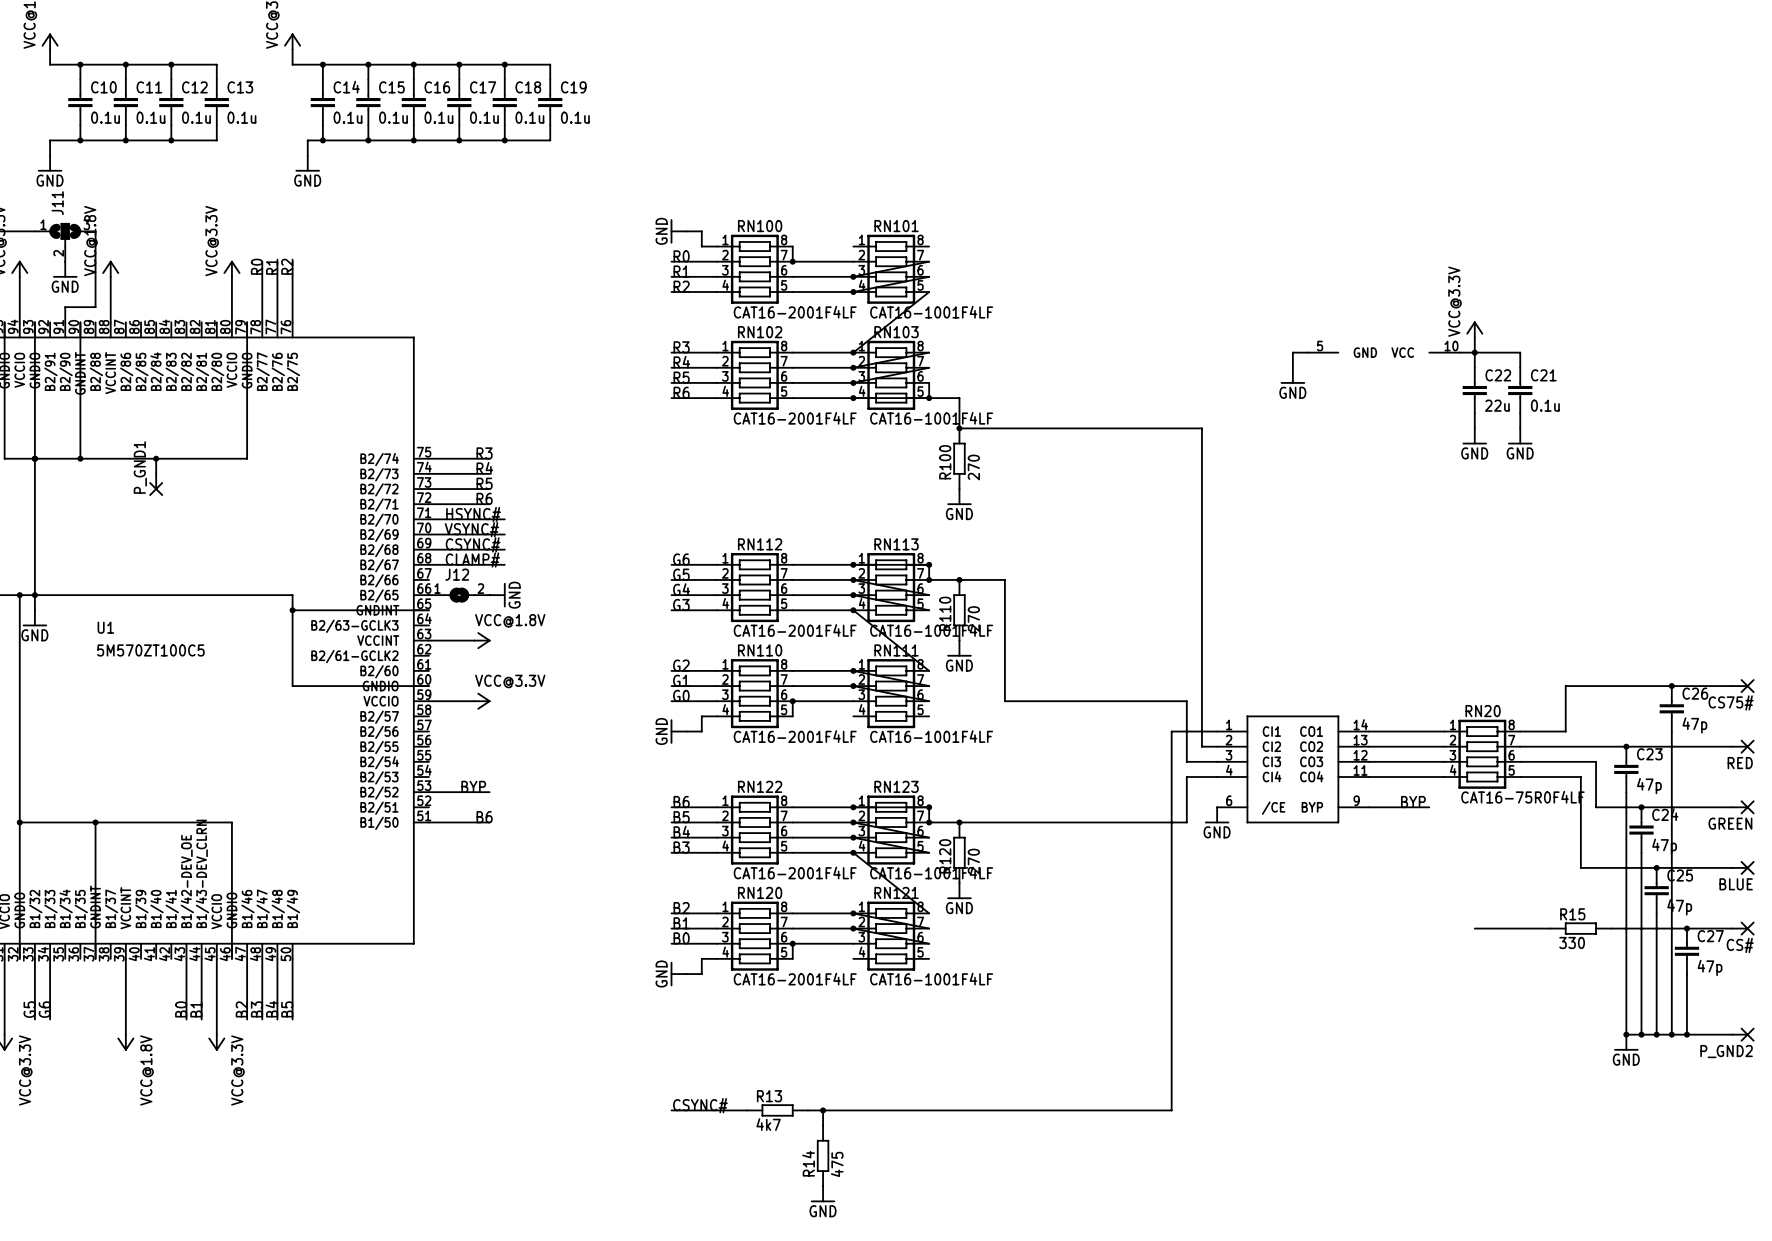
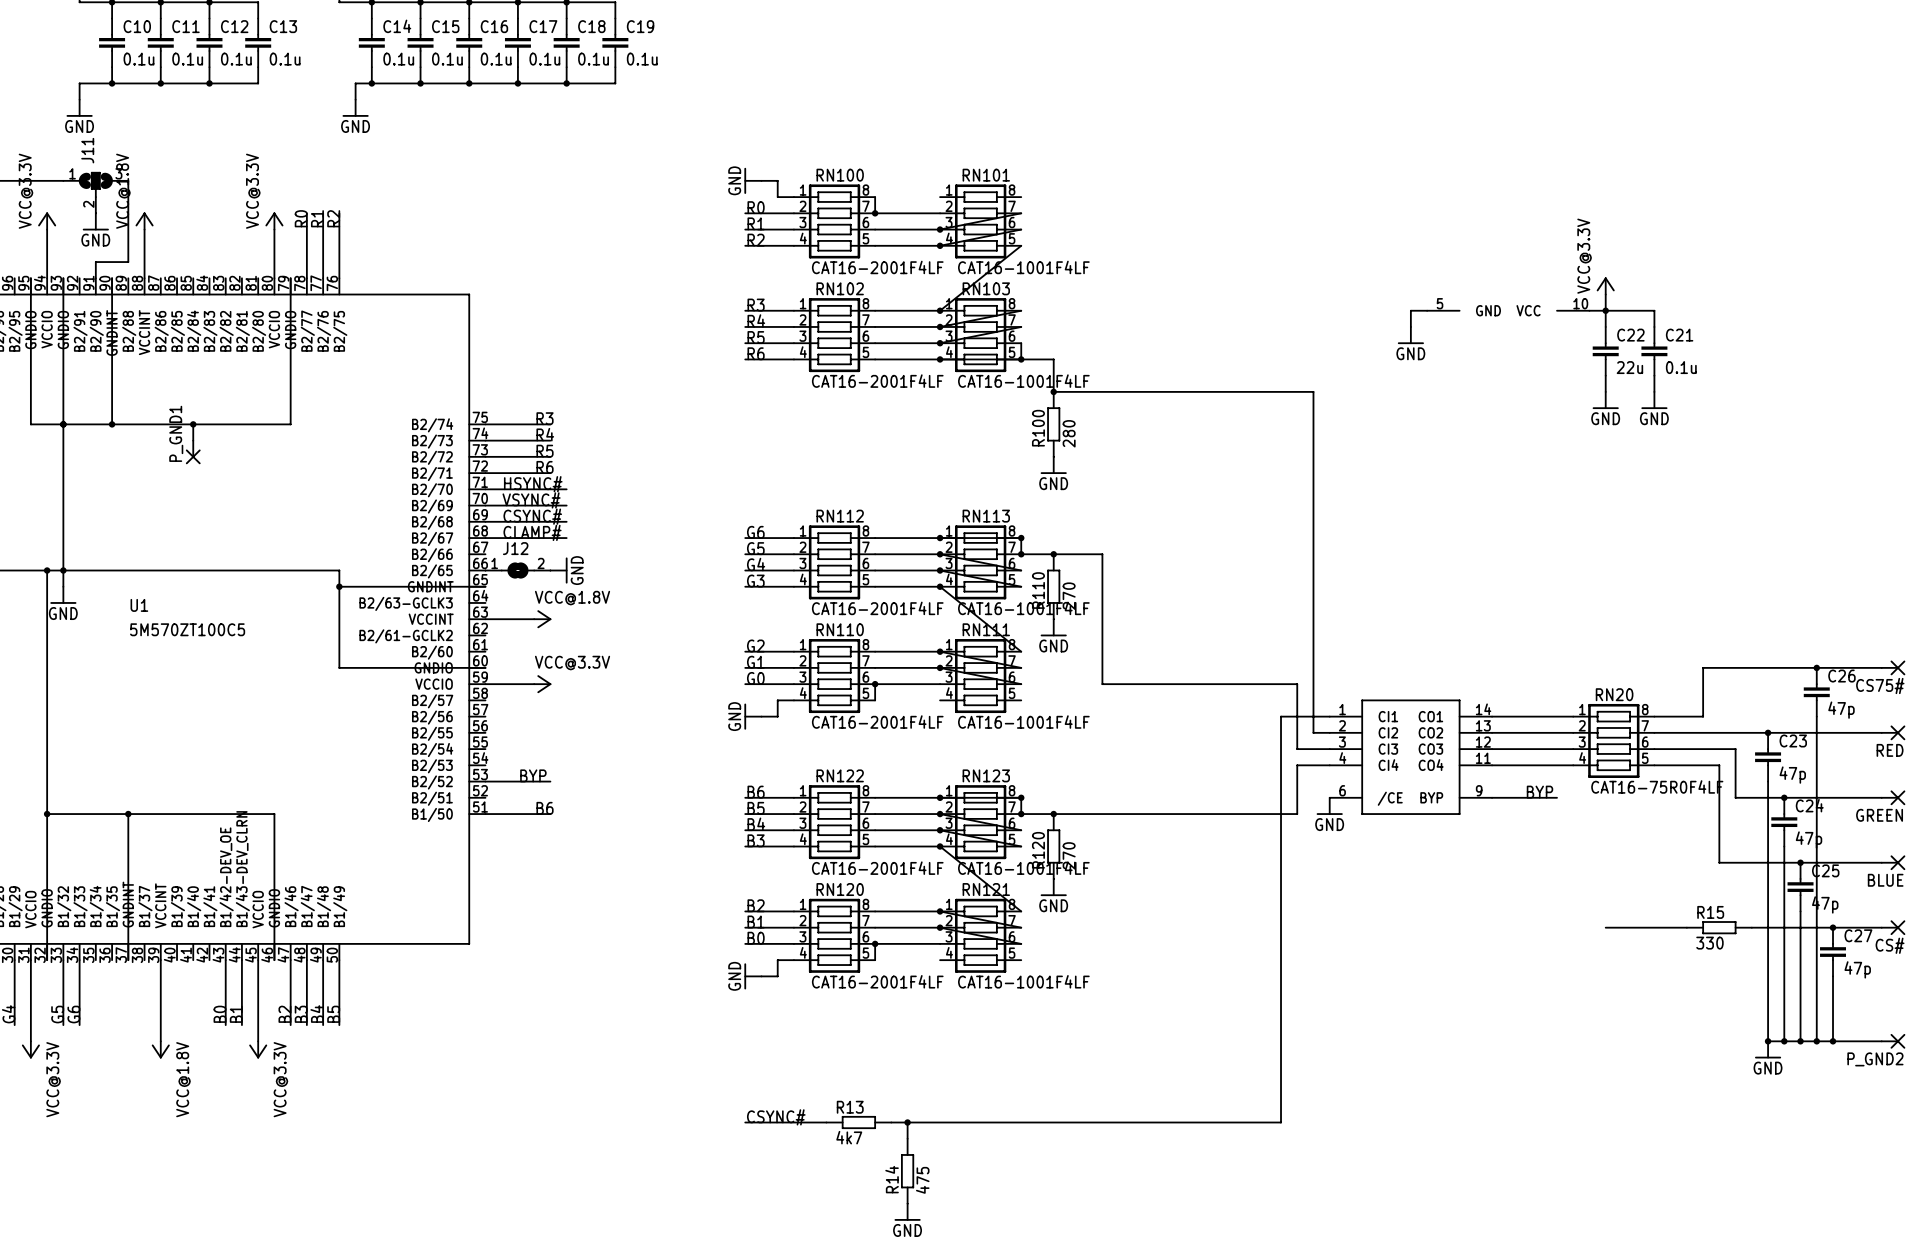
R100 value: 270 (973, 467) -> 280 (1069, 433)

